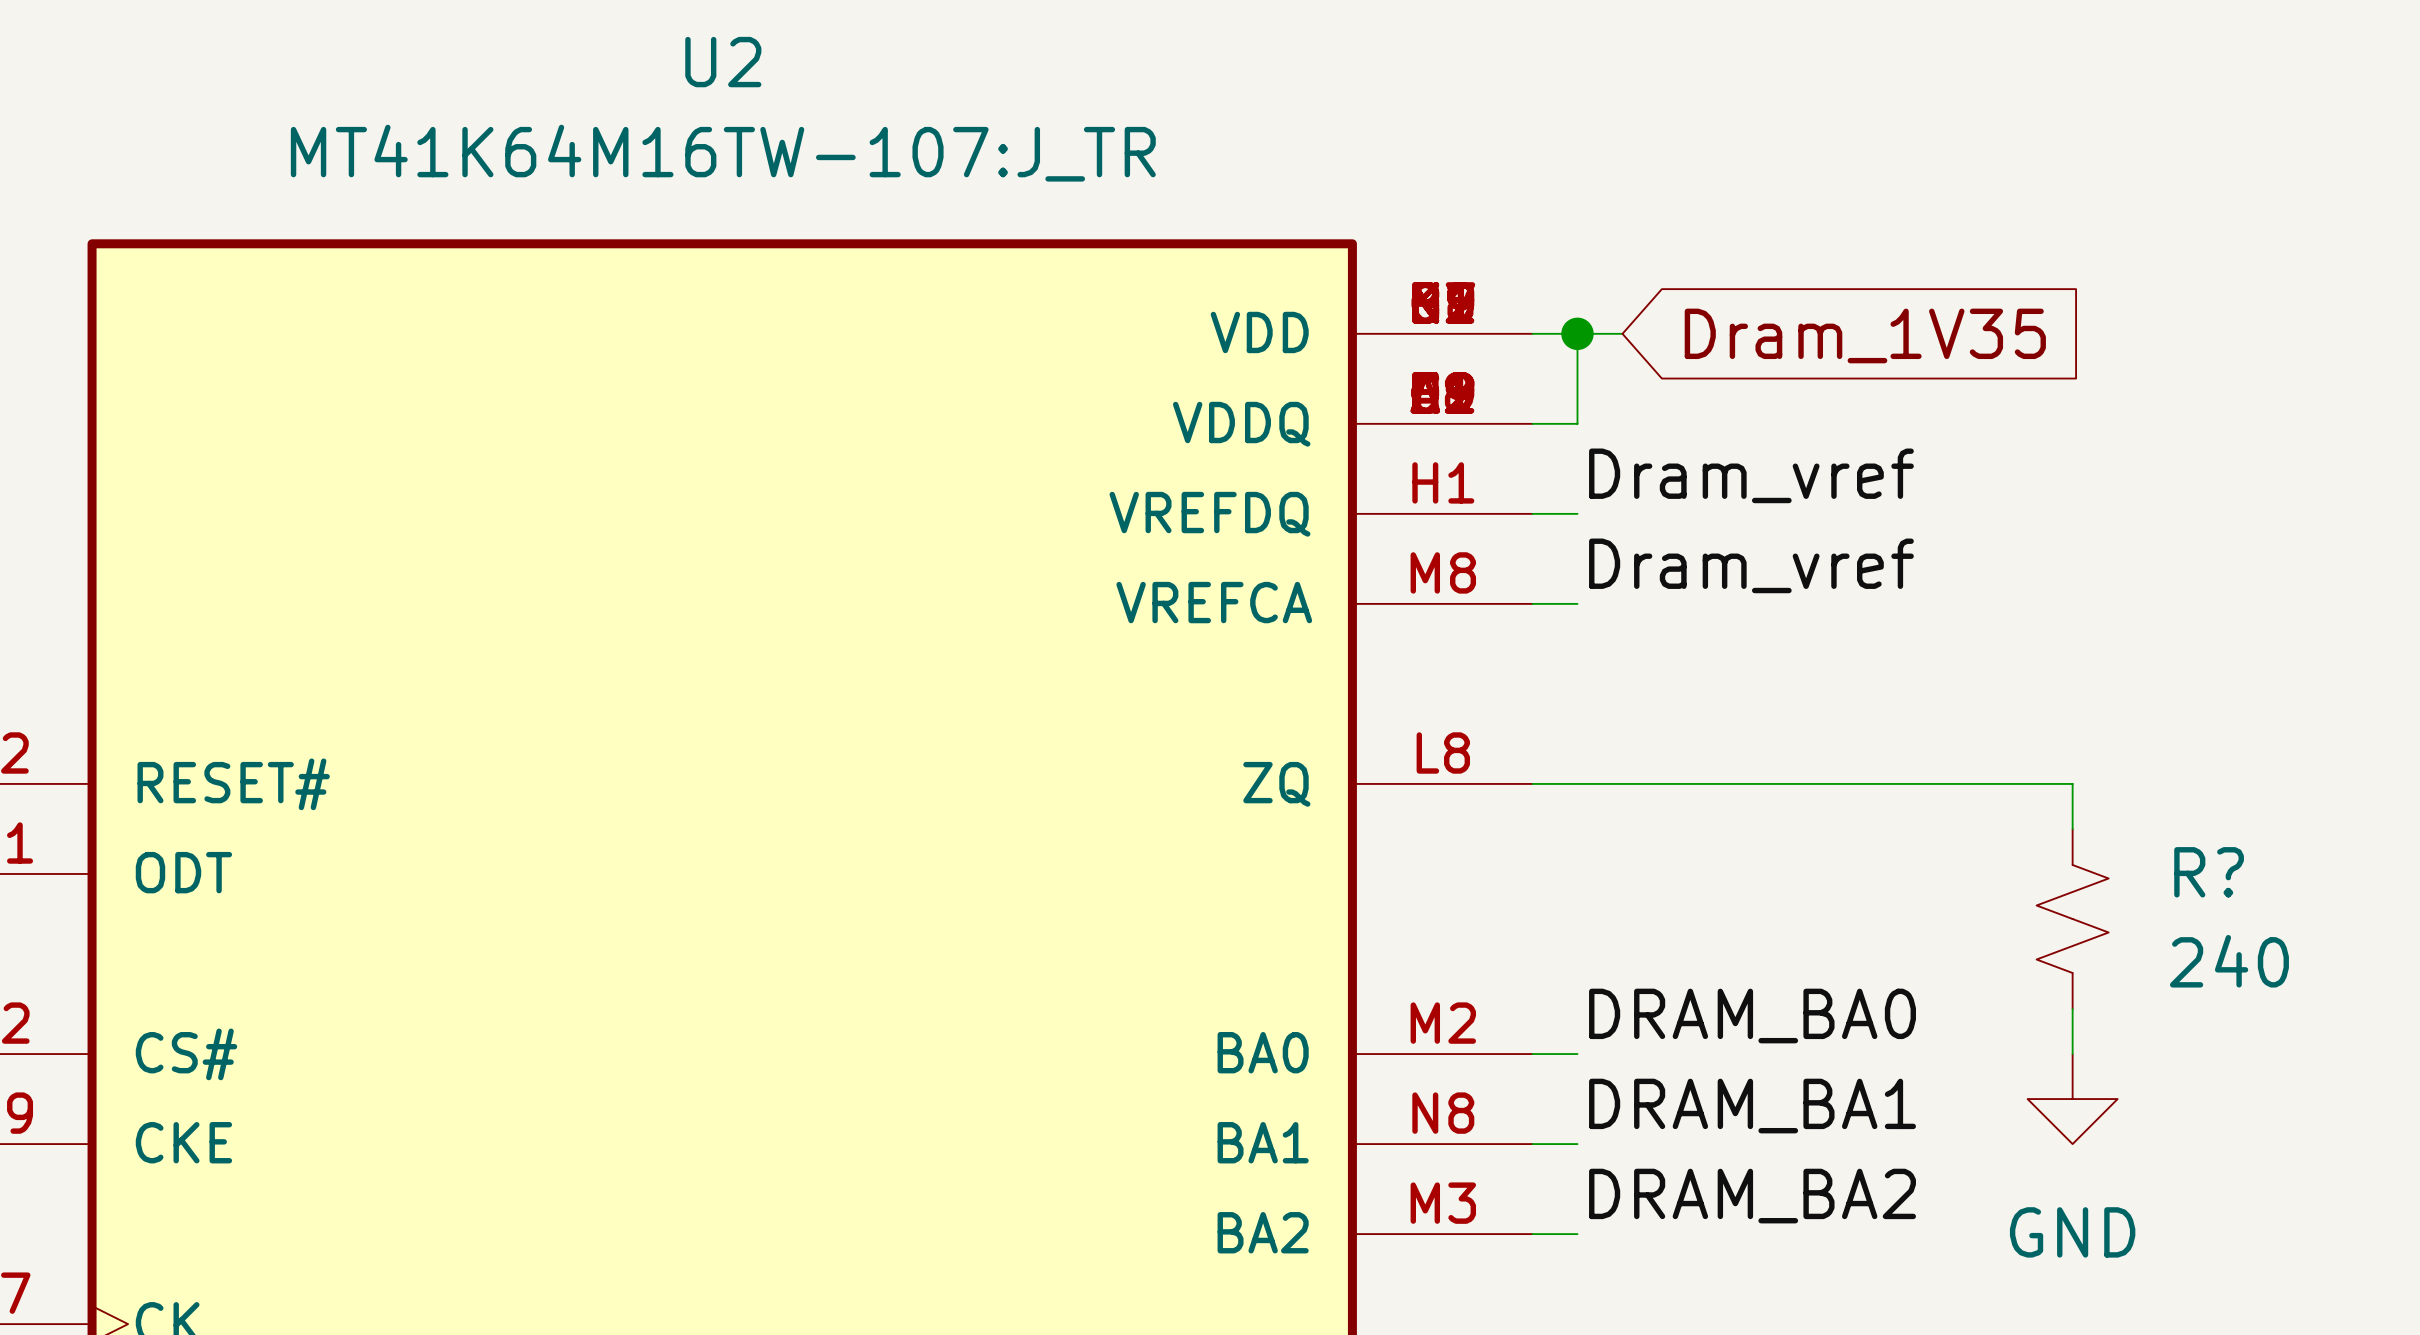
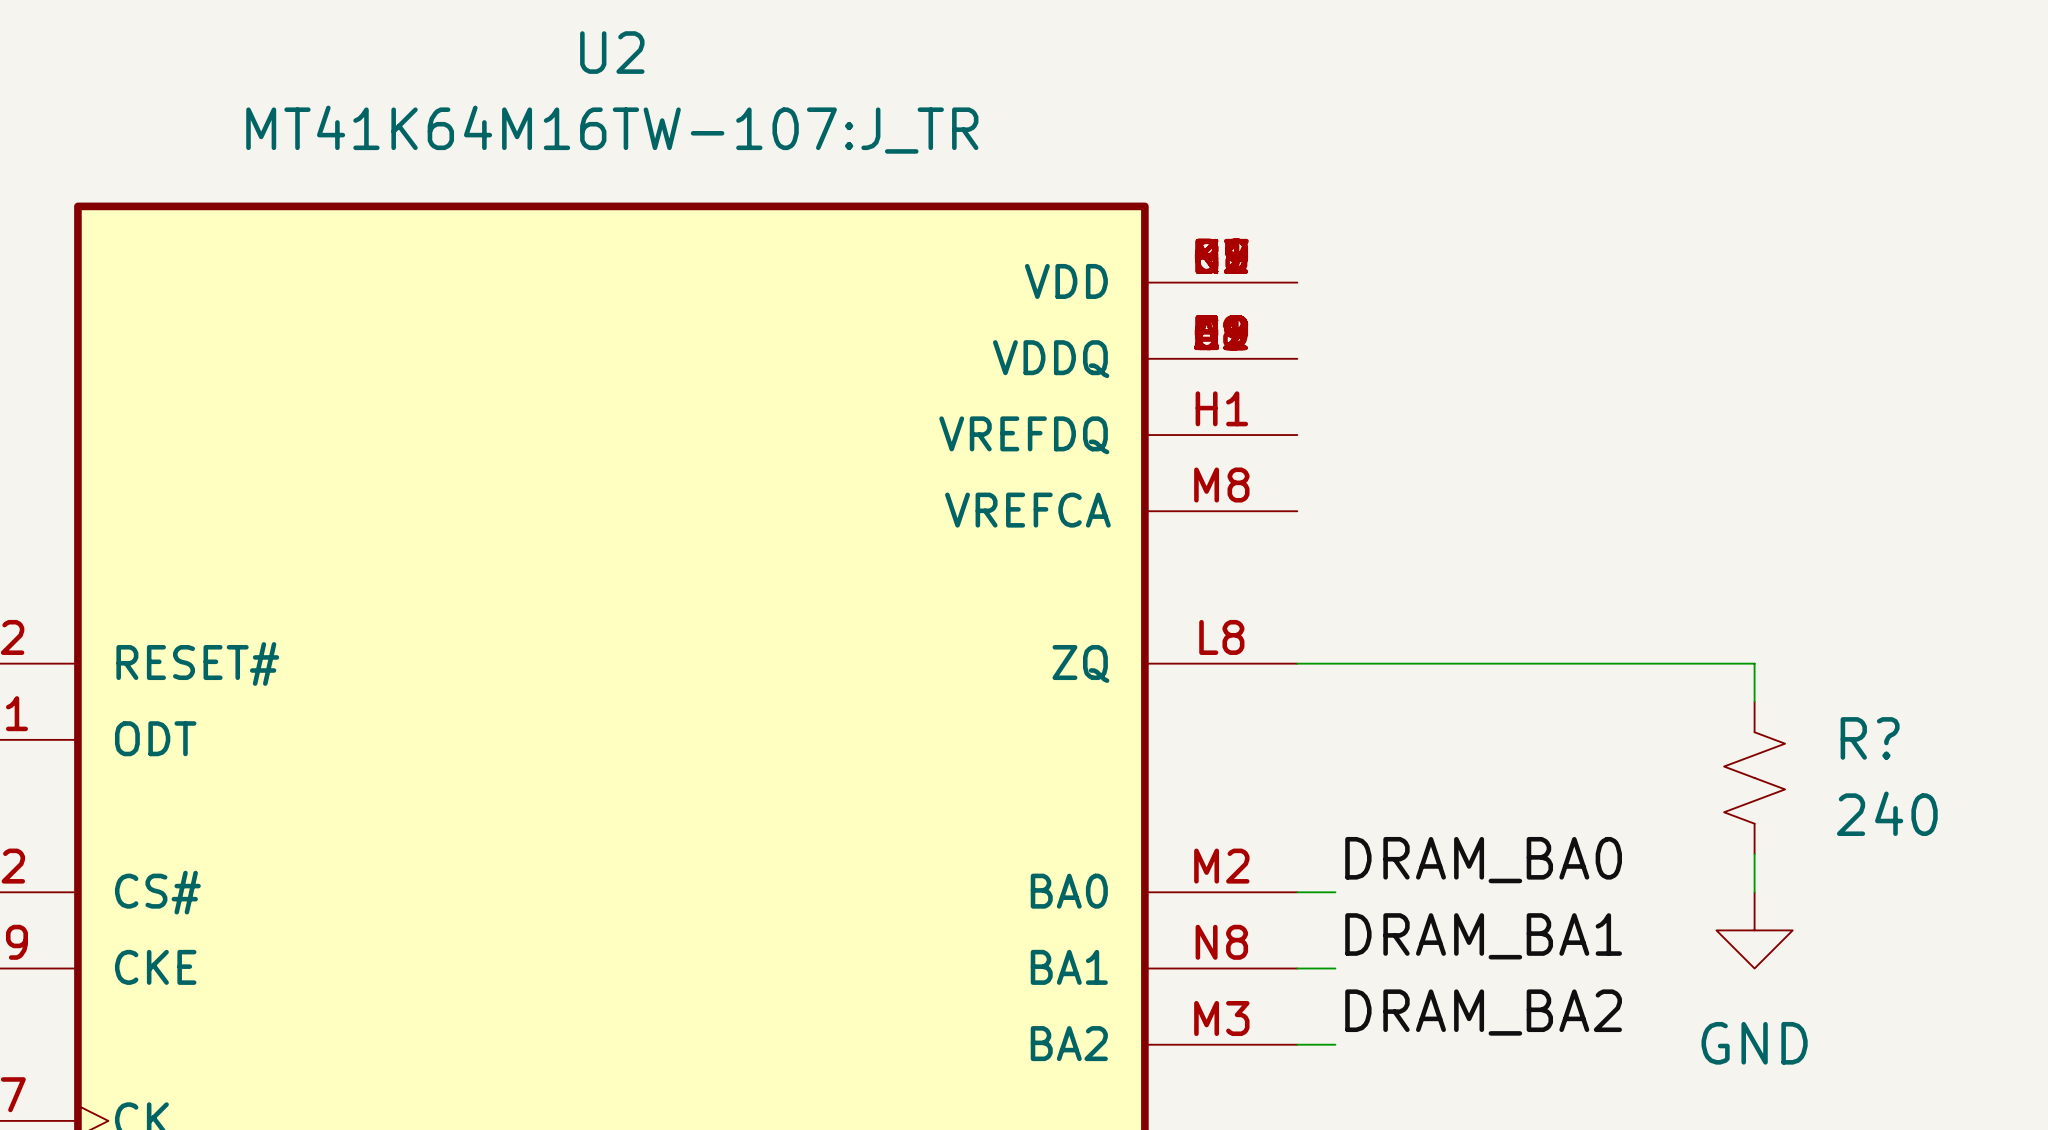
wire: (1532, 333) (1622, 333) -> none
wire: (1577, 333) (1577, 423) (1532, 423) -> none
junction: (1577, 333) -> none
global label: Dram_1V35 (1865, 335) -> none
label: Dram_vref (1751, 475) -> none
wire: (1532, 513) (1577, 513) -> none
label: Dram_vref (1751, 565) -> none
wire: (1532, 603) (1577, 603) -> none

